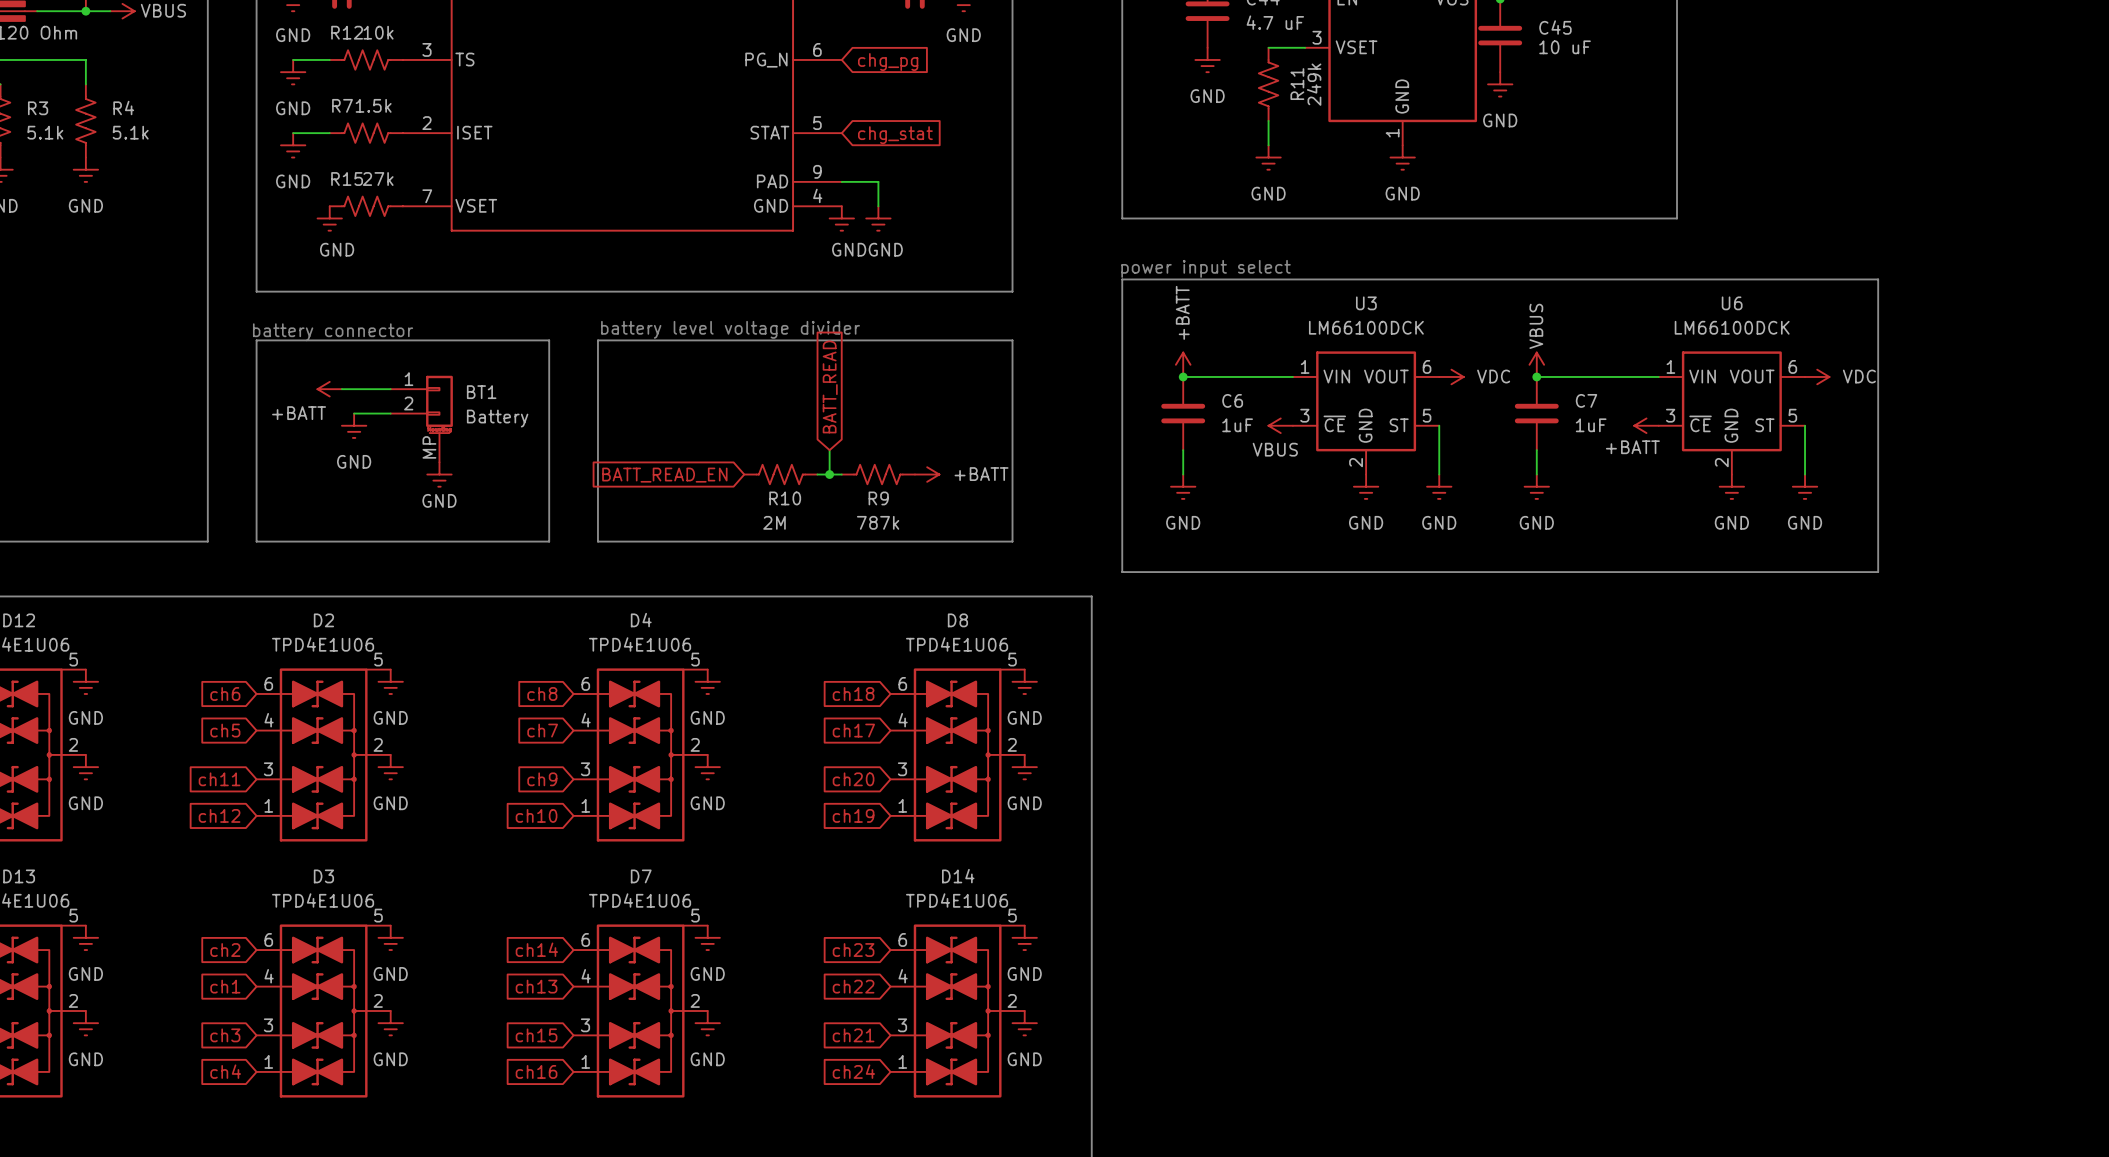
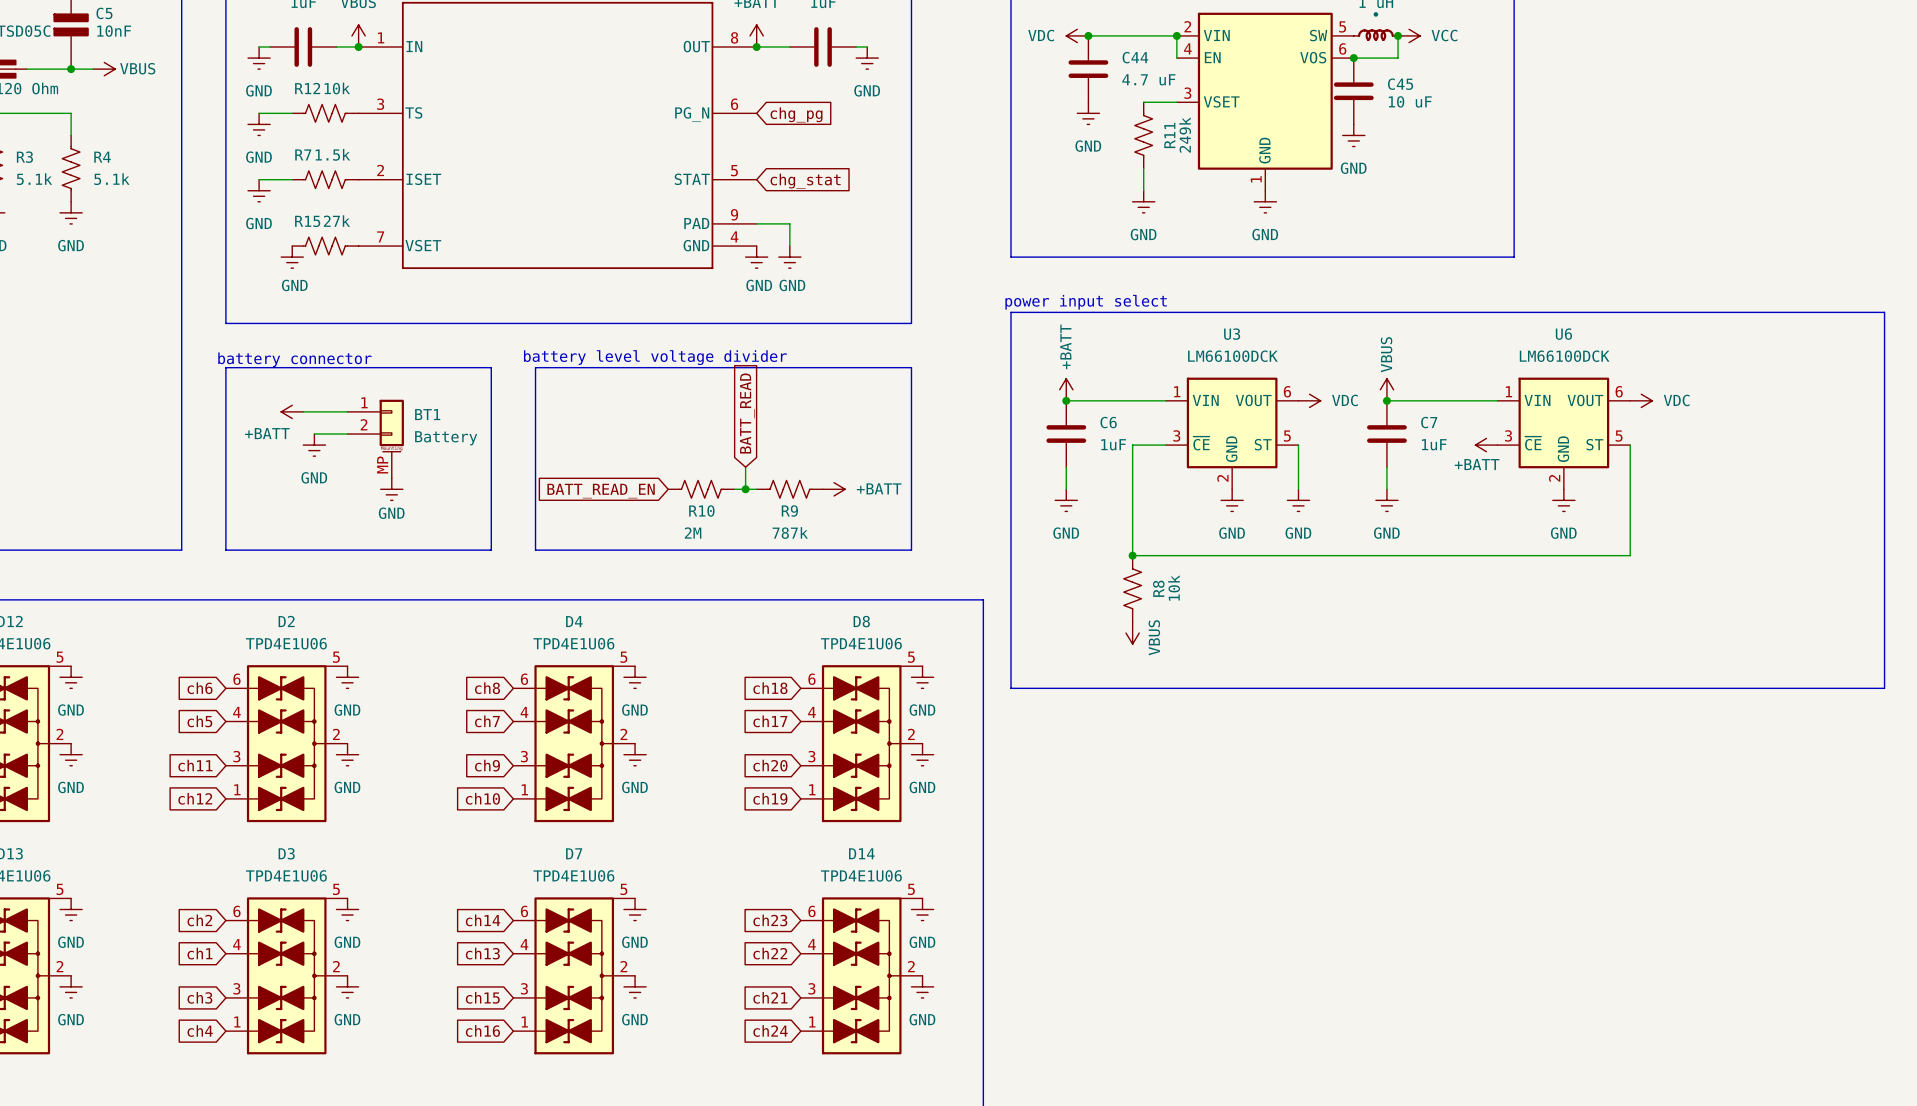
line: (1878, 279) (1878, 572) (1122, 572) -> (1696, 312) (1884, 312) (1884, 688) (1011, 688) (1011, 577)
power symbol rotation: 0° (1280, 425) -> 90° counterclockwise (1132, 633)
power symbol position: VBUS (1280, 425) -> VBUS (1132, 633)
wire: none -> (1165, 445) (1132, 445) (1132, 555) (1630, 555) (1630, 489)
power symbol: GND (1805, 486) -> none
junction: none -> (1132, 555)
R8: none -> 10k (1132, 588)

